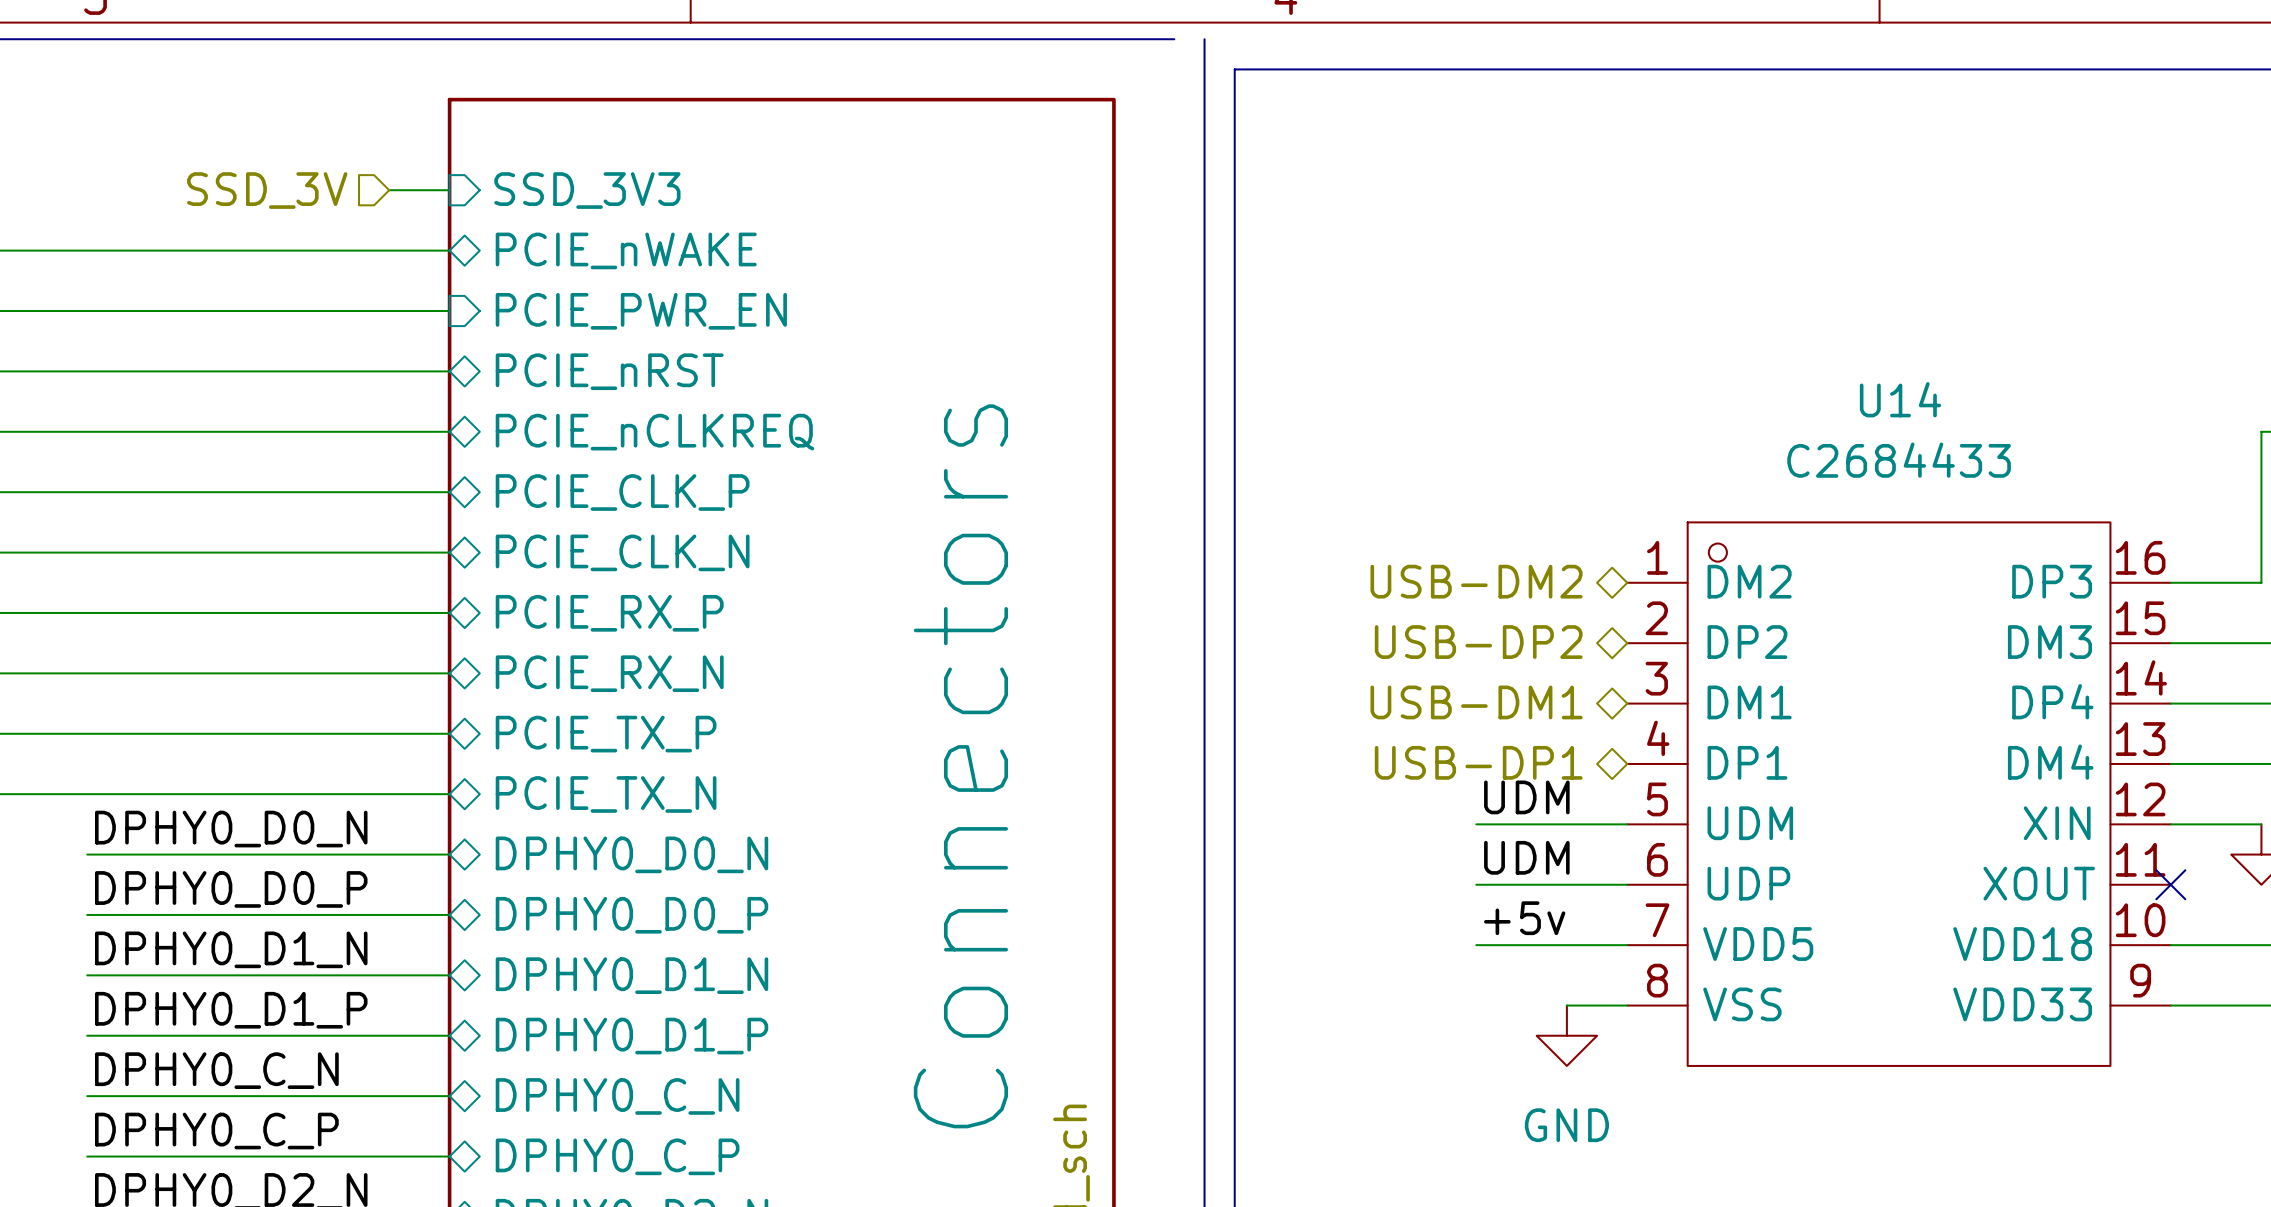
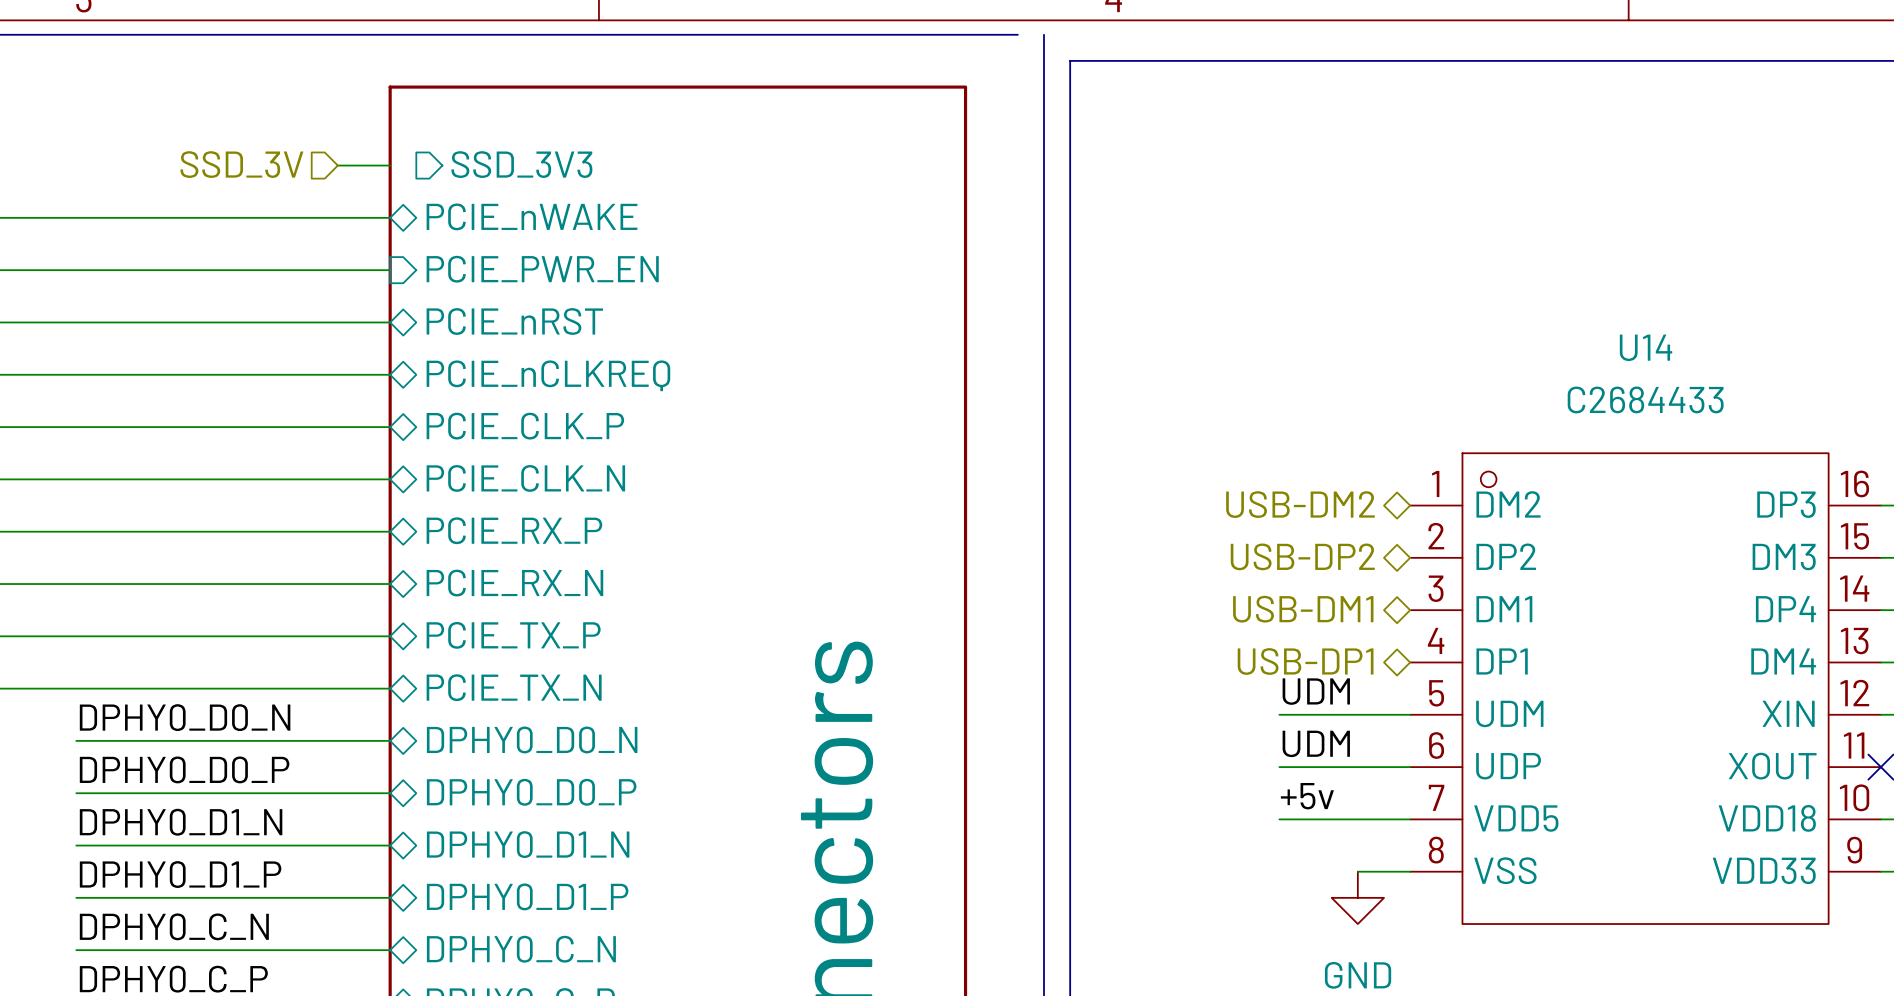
sheet pin position: SSD_3V3 (587, 190) -> SSD_3V3 (521, 164)

